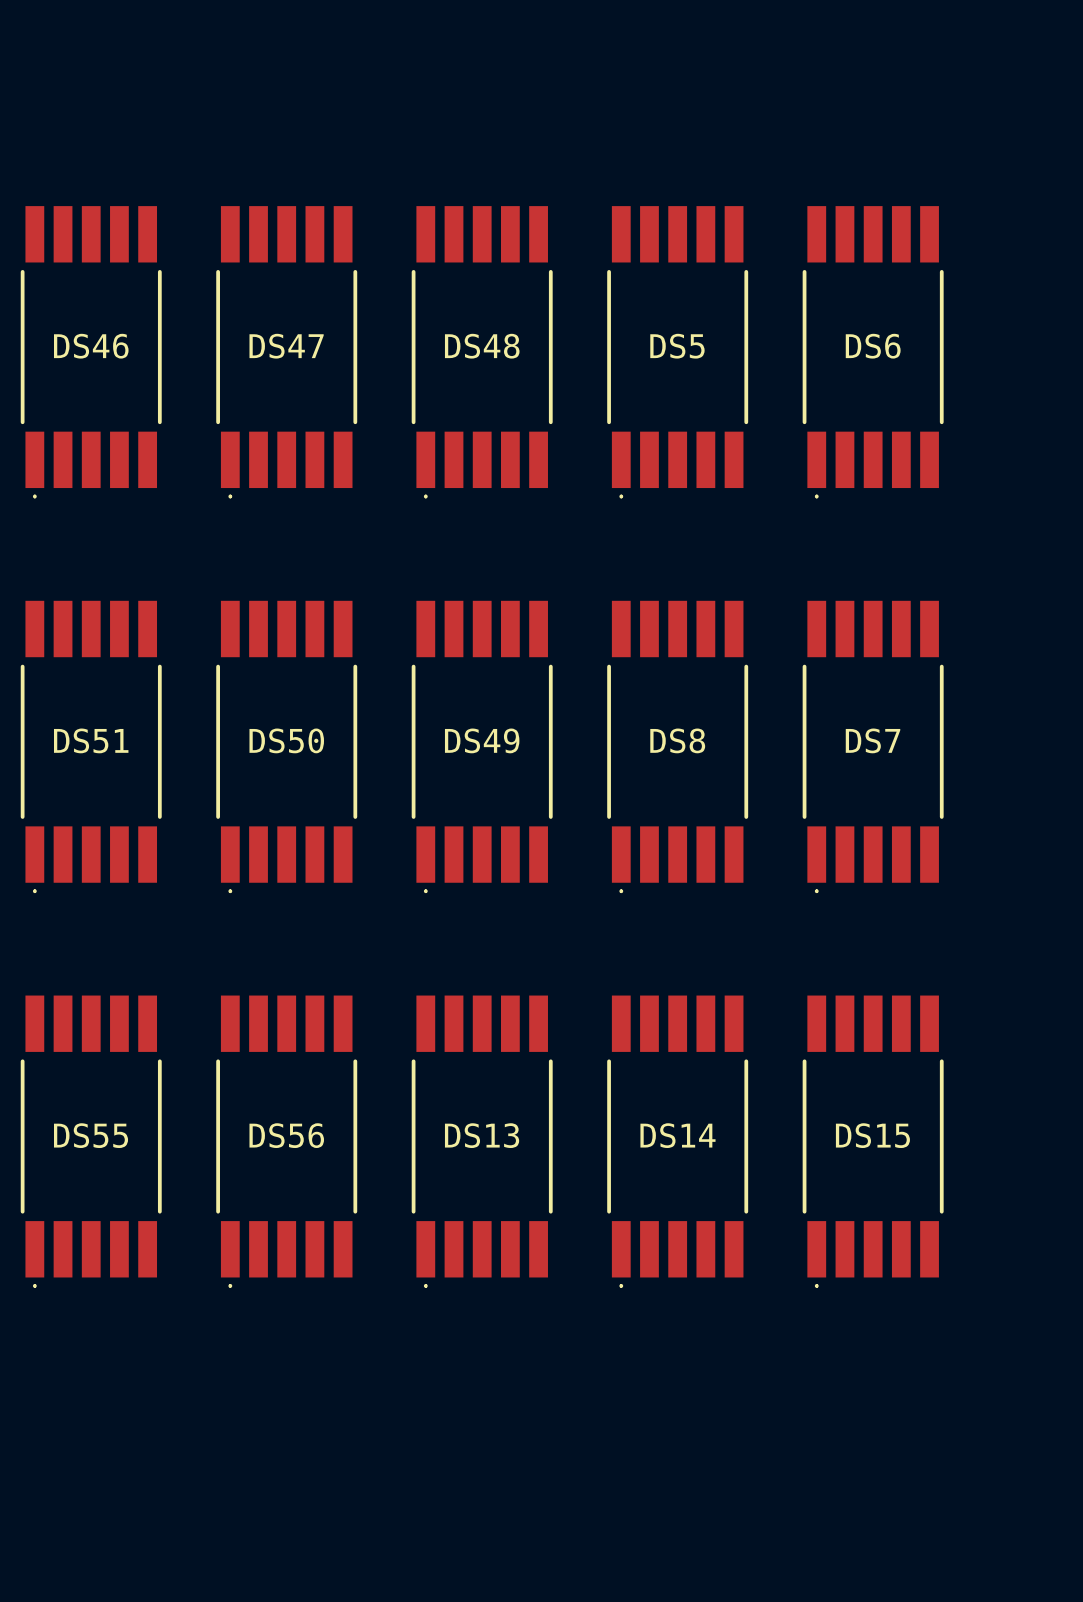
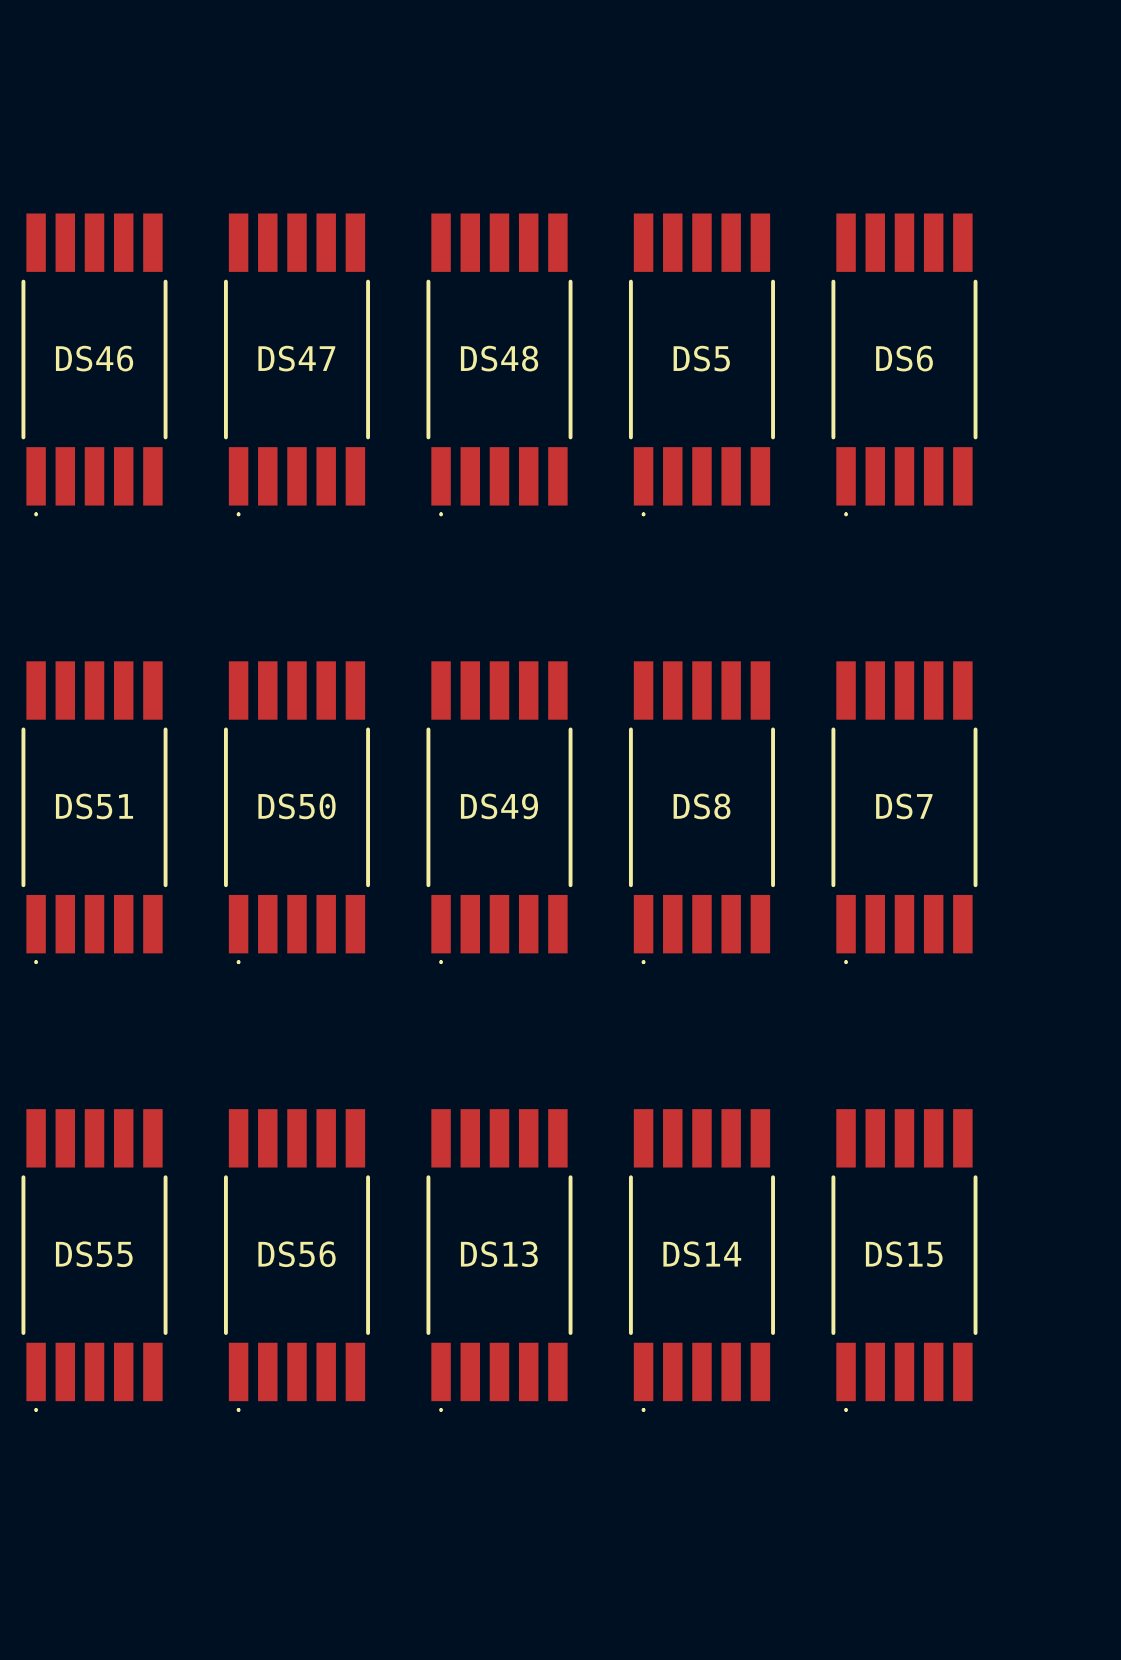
DS51 position: (91, 746) -> (94, 812)
DS50 position: (286, 746) -> (296, 812)
DS49 position: (482, 746) -> (499, 812)
DS8 position: (677, 746) -> (701, 812)
DS7 position: (873, 746) -> (904, 812)
DS55 position: (91, 1141) -> (94, 1260)
DS56 position: (286, 1141) -> (296, 1260)
DS13 position: (482, 1141) -> (499, 1260)
DS14 position: (677, 1141) -> (701, 1260)
DS15 position: (873, 1141) -> (904, 1260)

